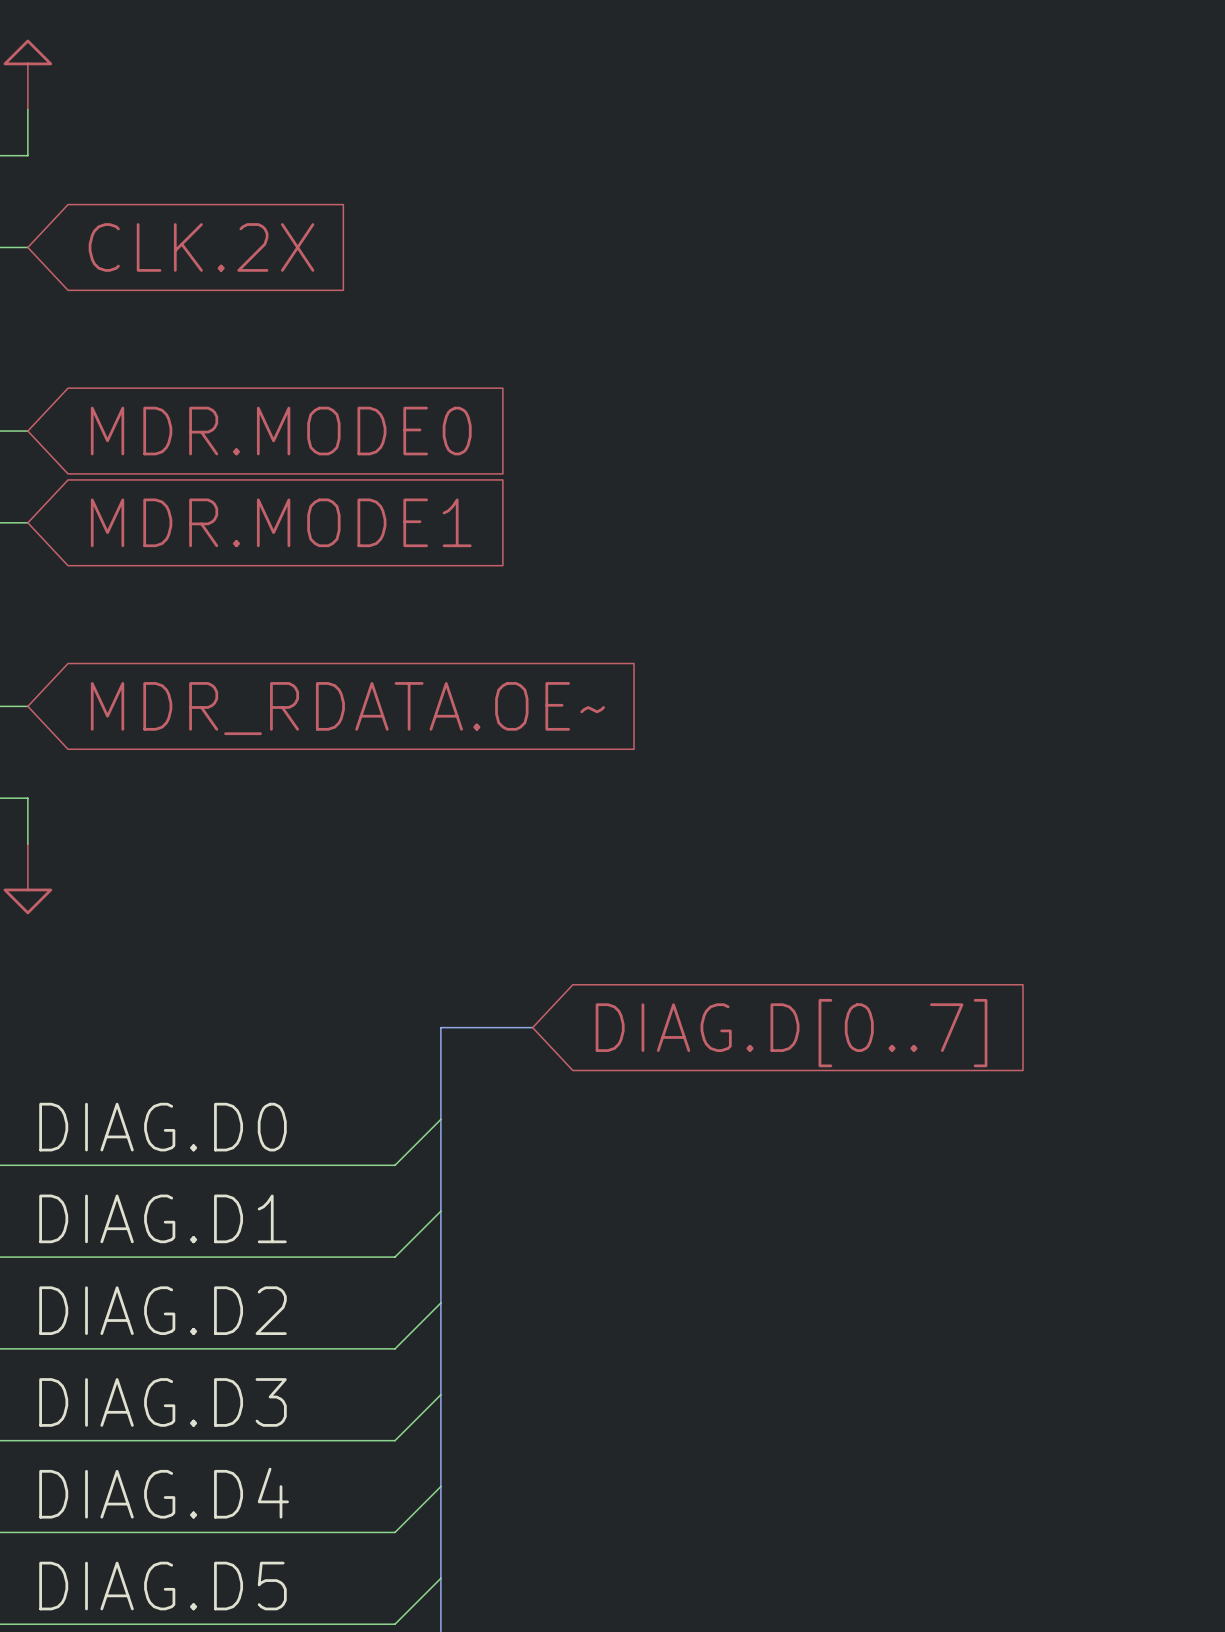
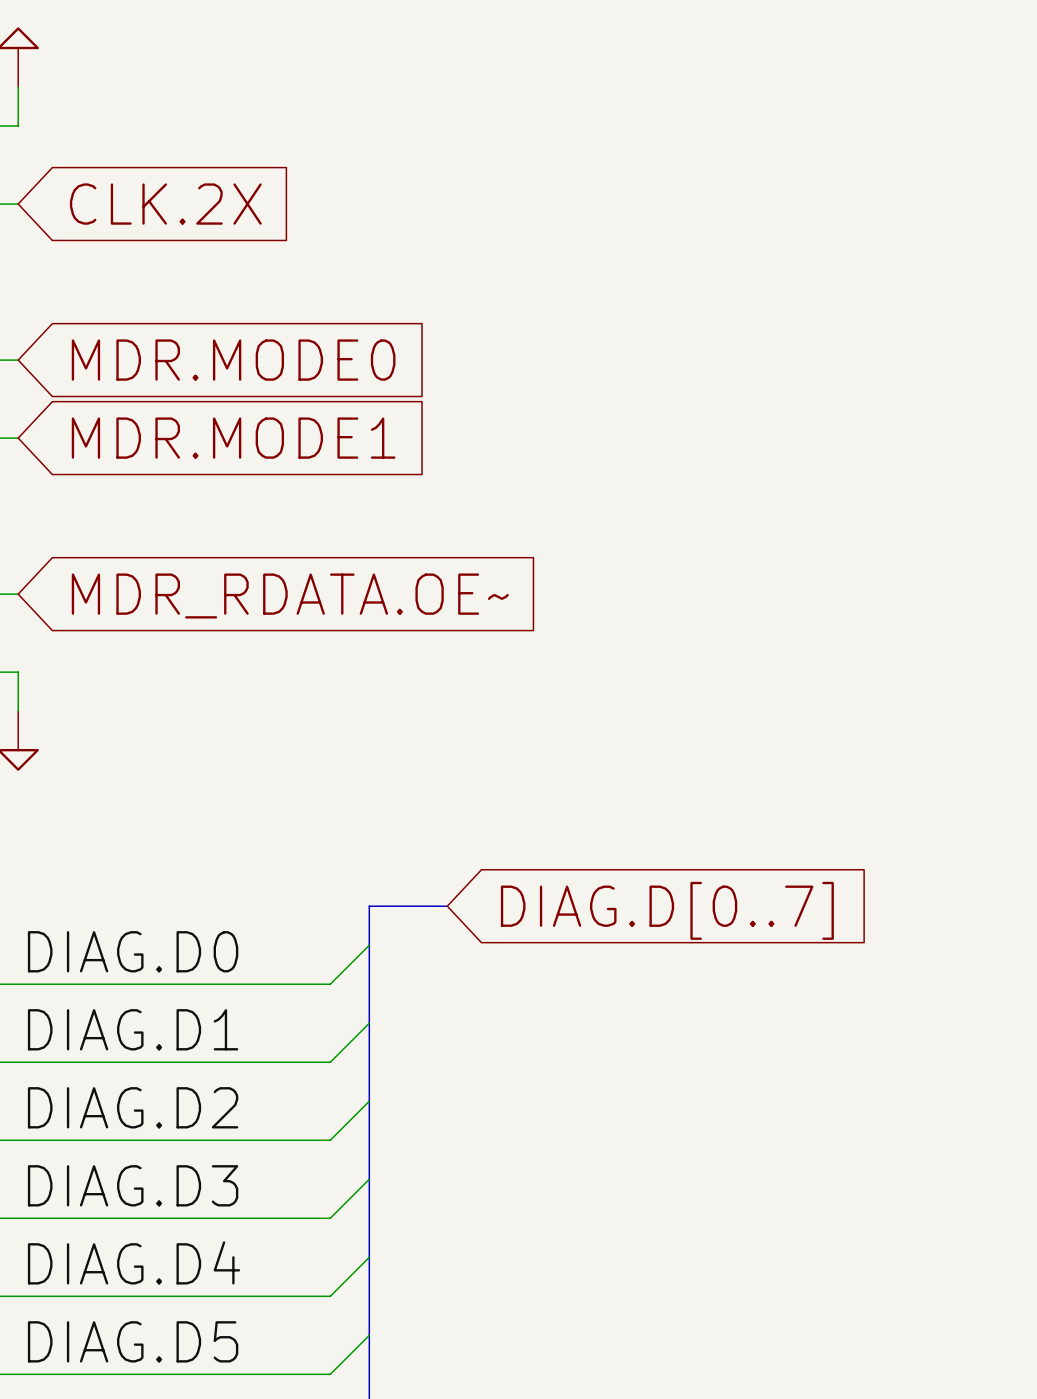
bus: (532, 1027) (440, 1027) (440, 1073) -> (447, 906) (369, 906)
global label position: DIAG.D[0..7] (791, 1033) -> DIAG.D[0..7] (667, 910)

